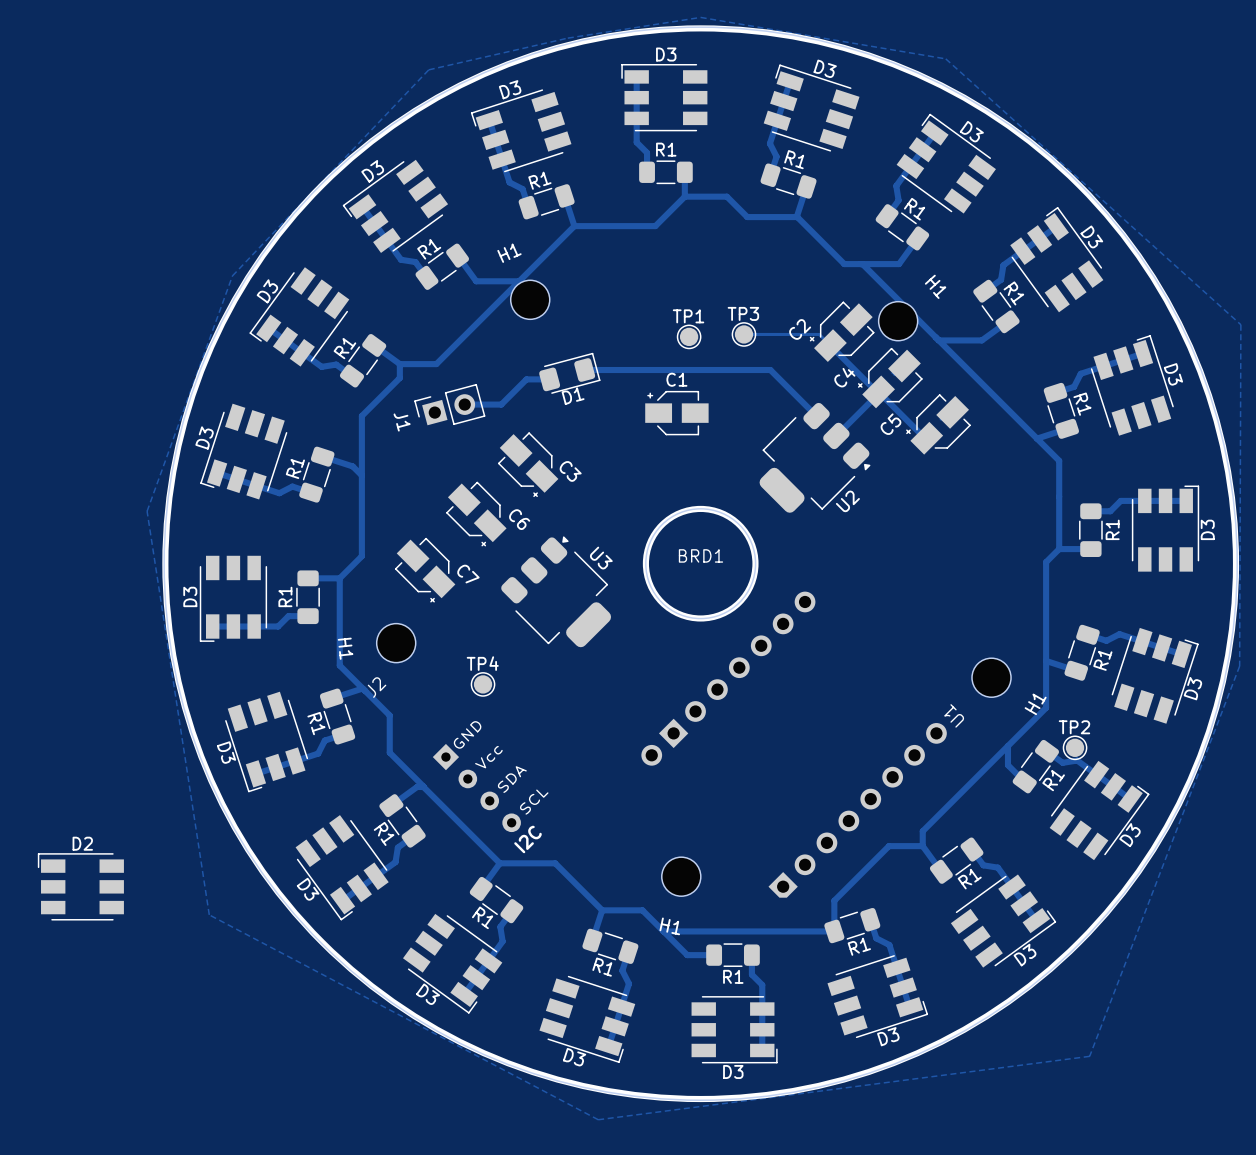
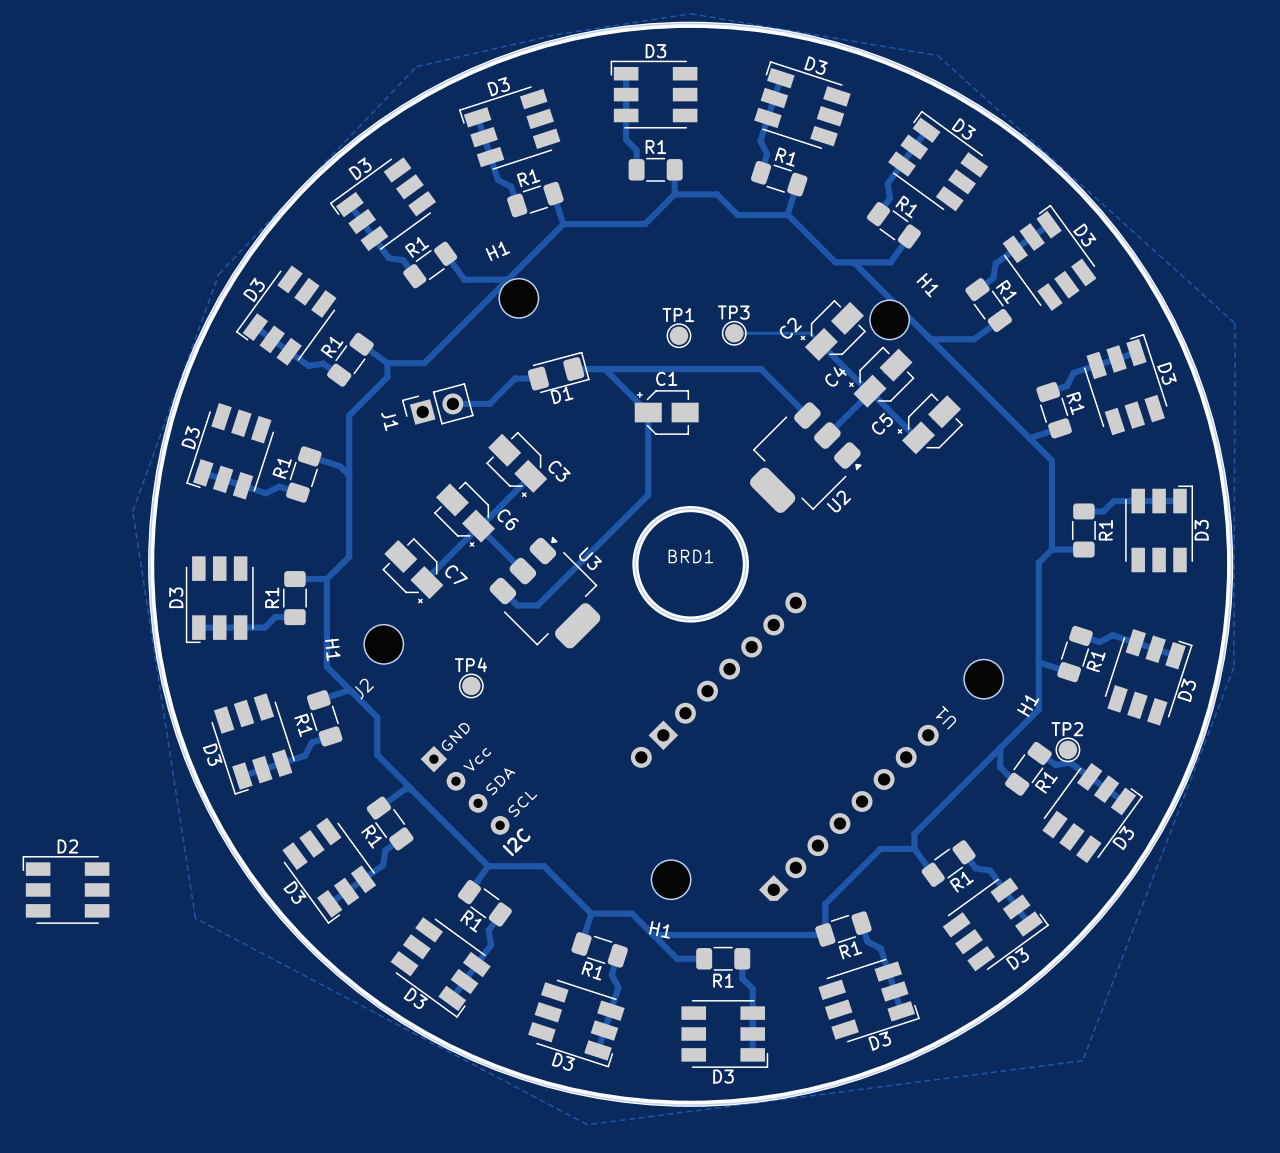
track: none -> (604, 369) (648, 412) (648, 494) (537, 605) (517, 605) (502, 591)
track: none -> (530, 476) (425, 580)
track: none -> (478, 526) (522, 571)

